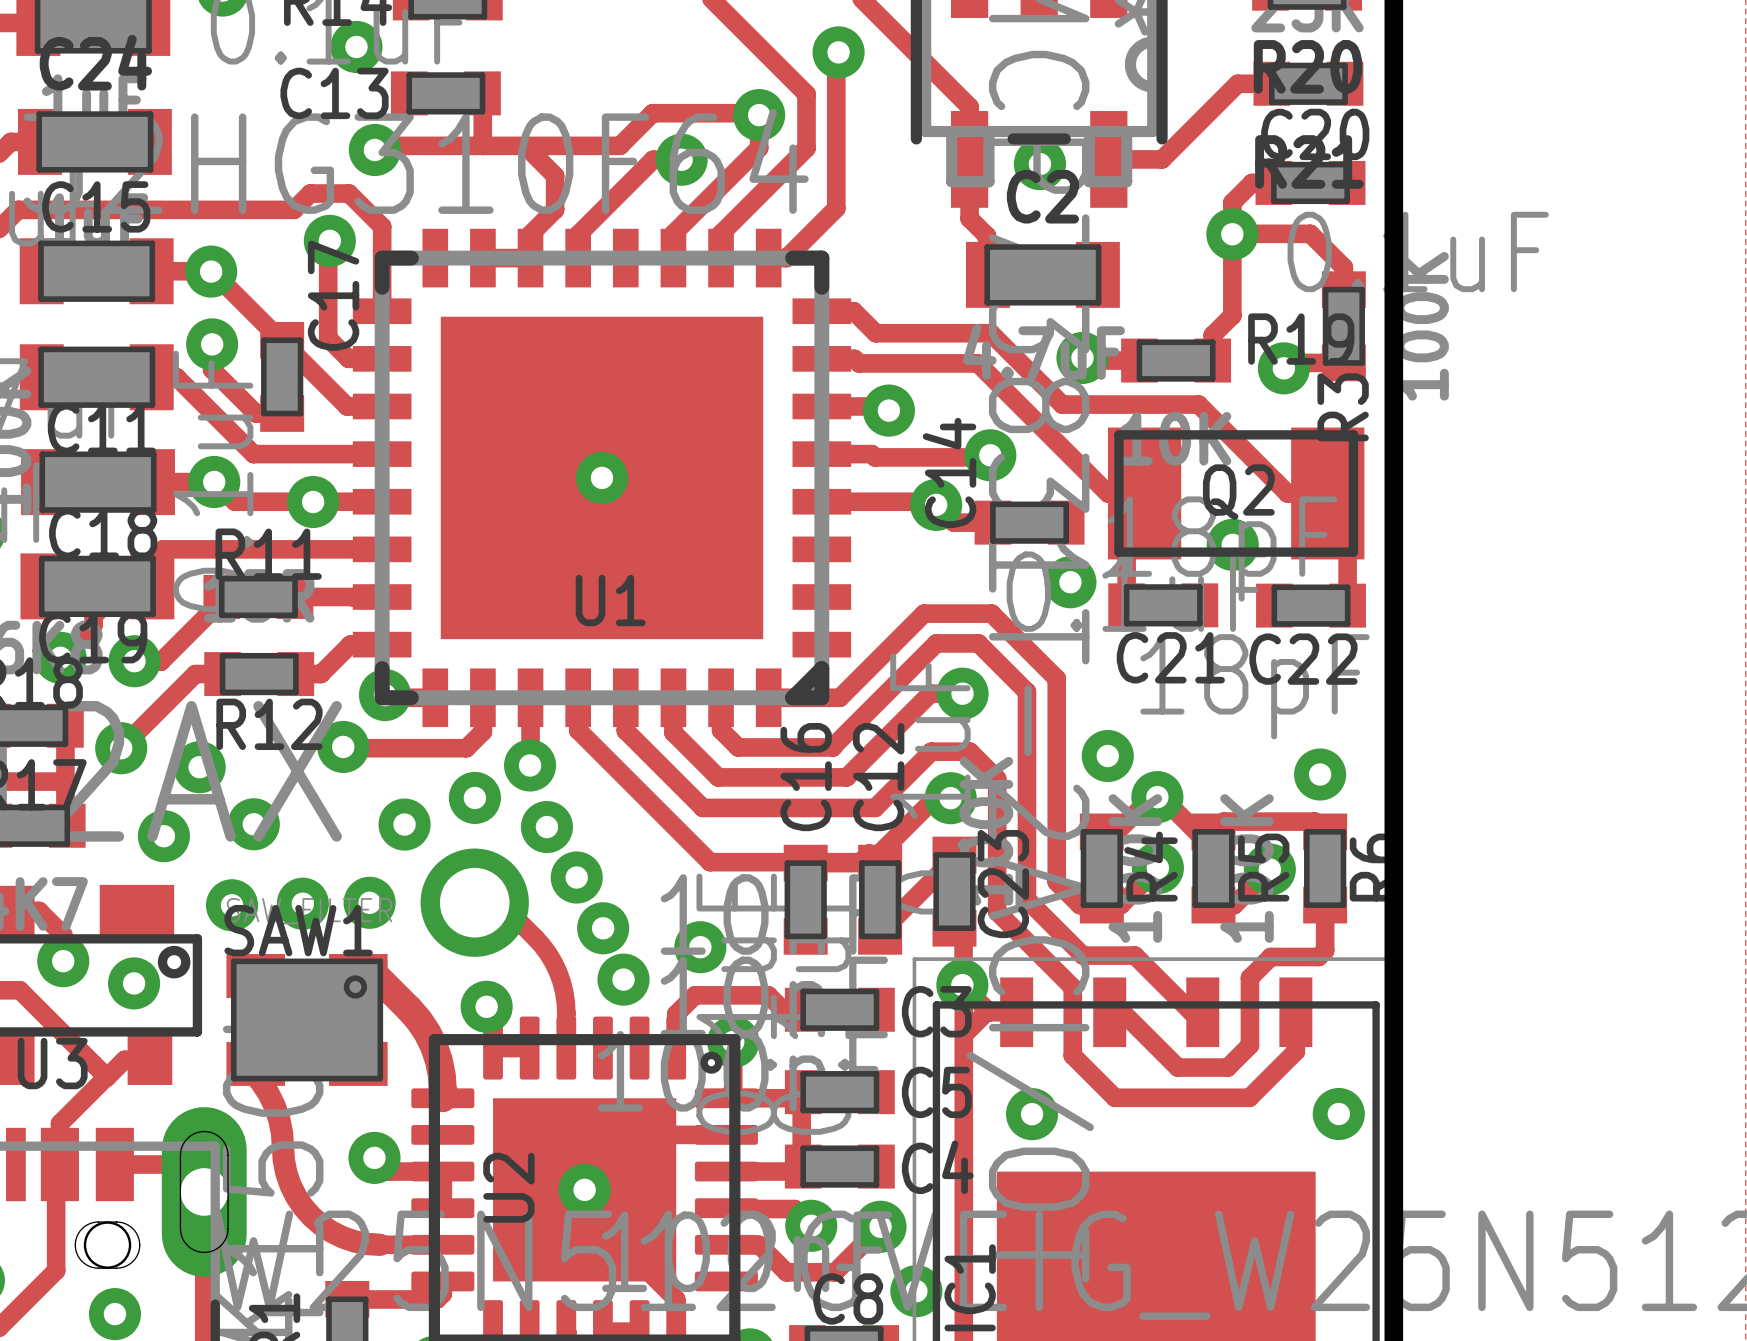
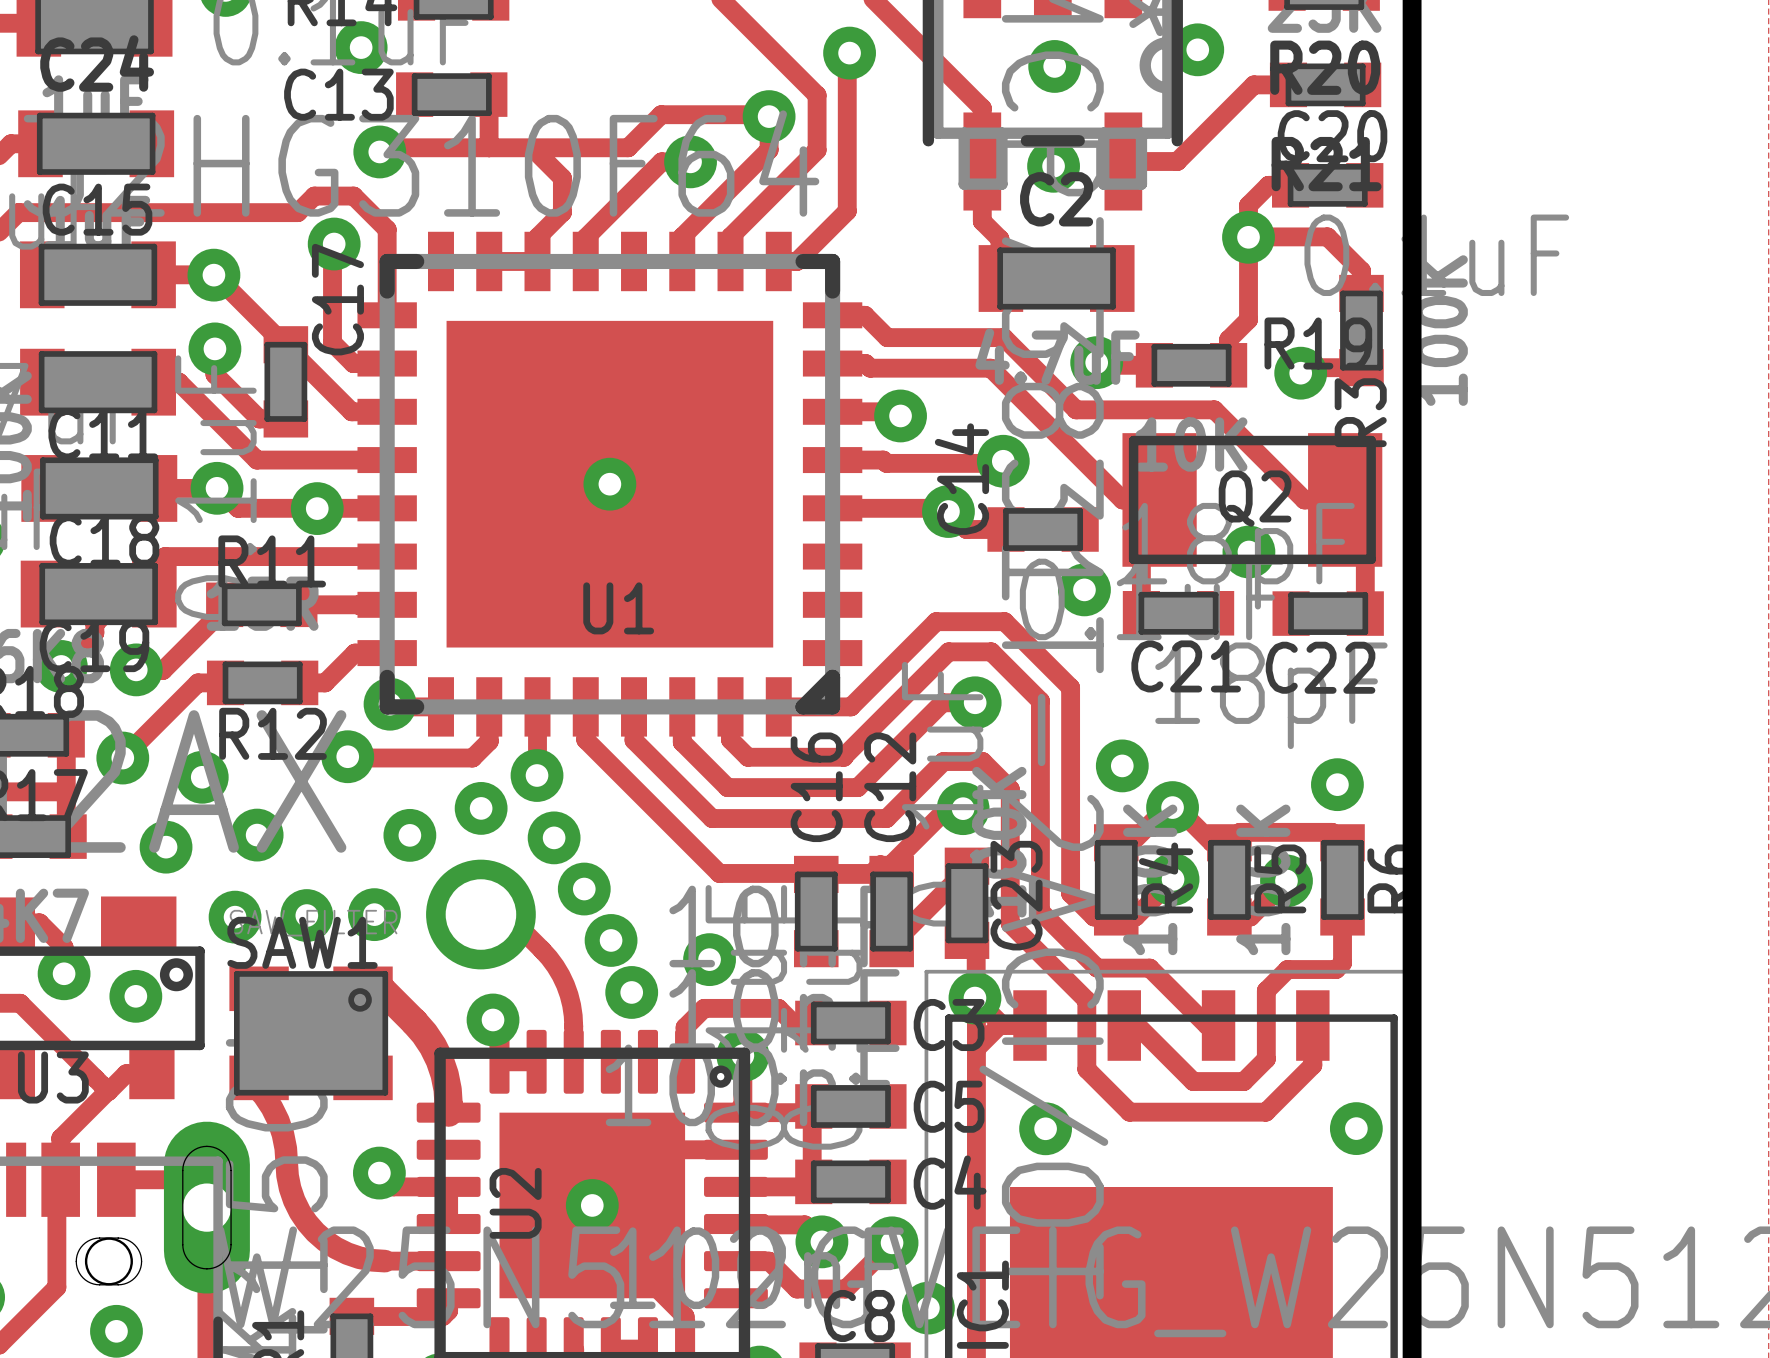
via: none -> (1197, 49)
via: none -> (1054, 66)

